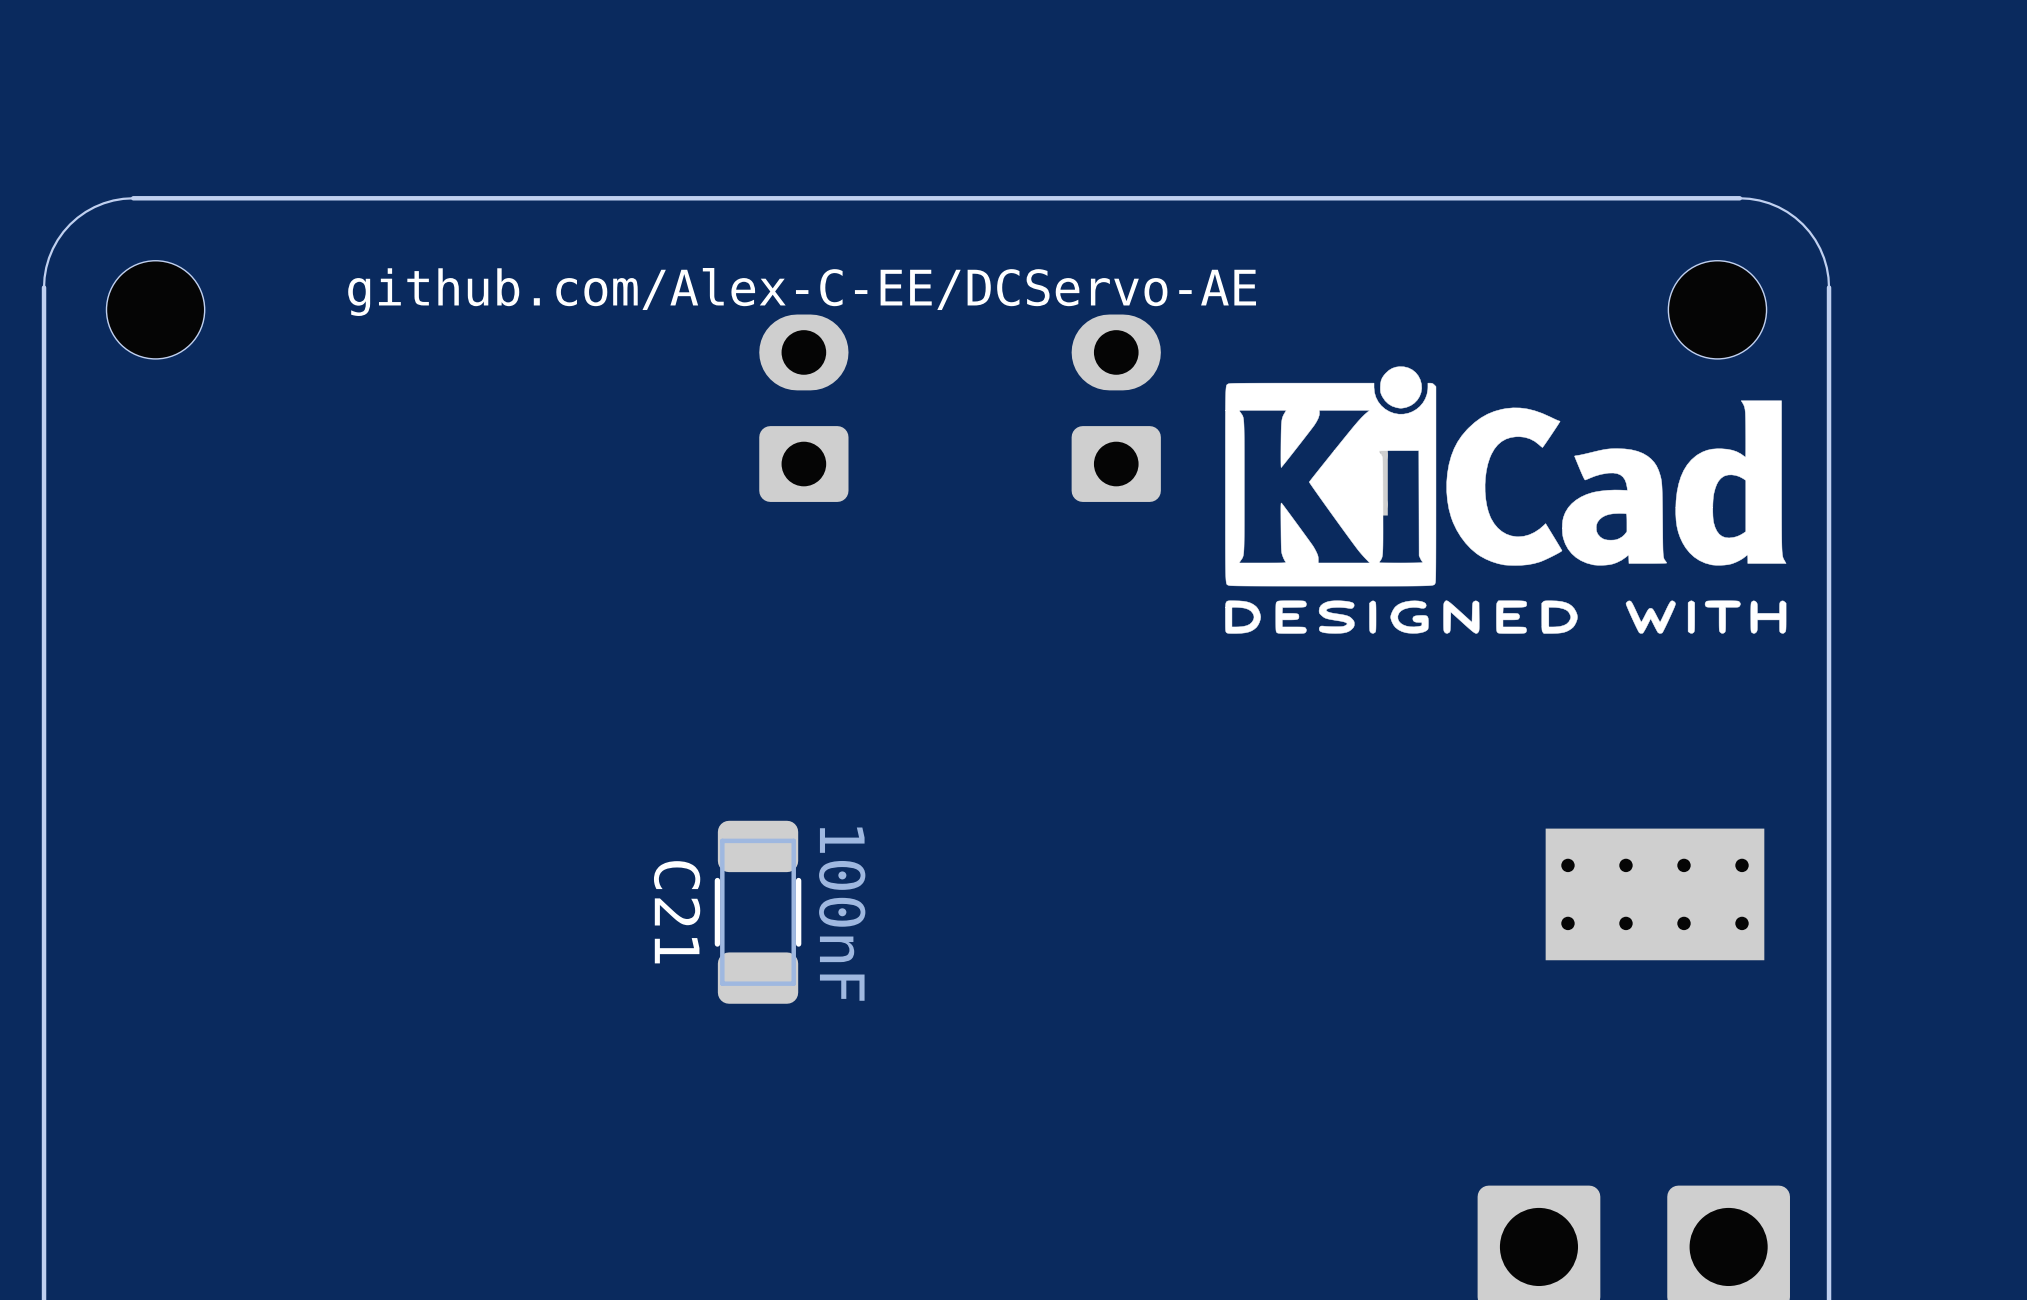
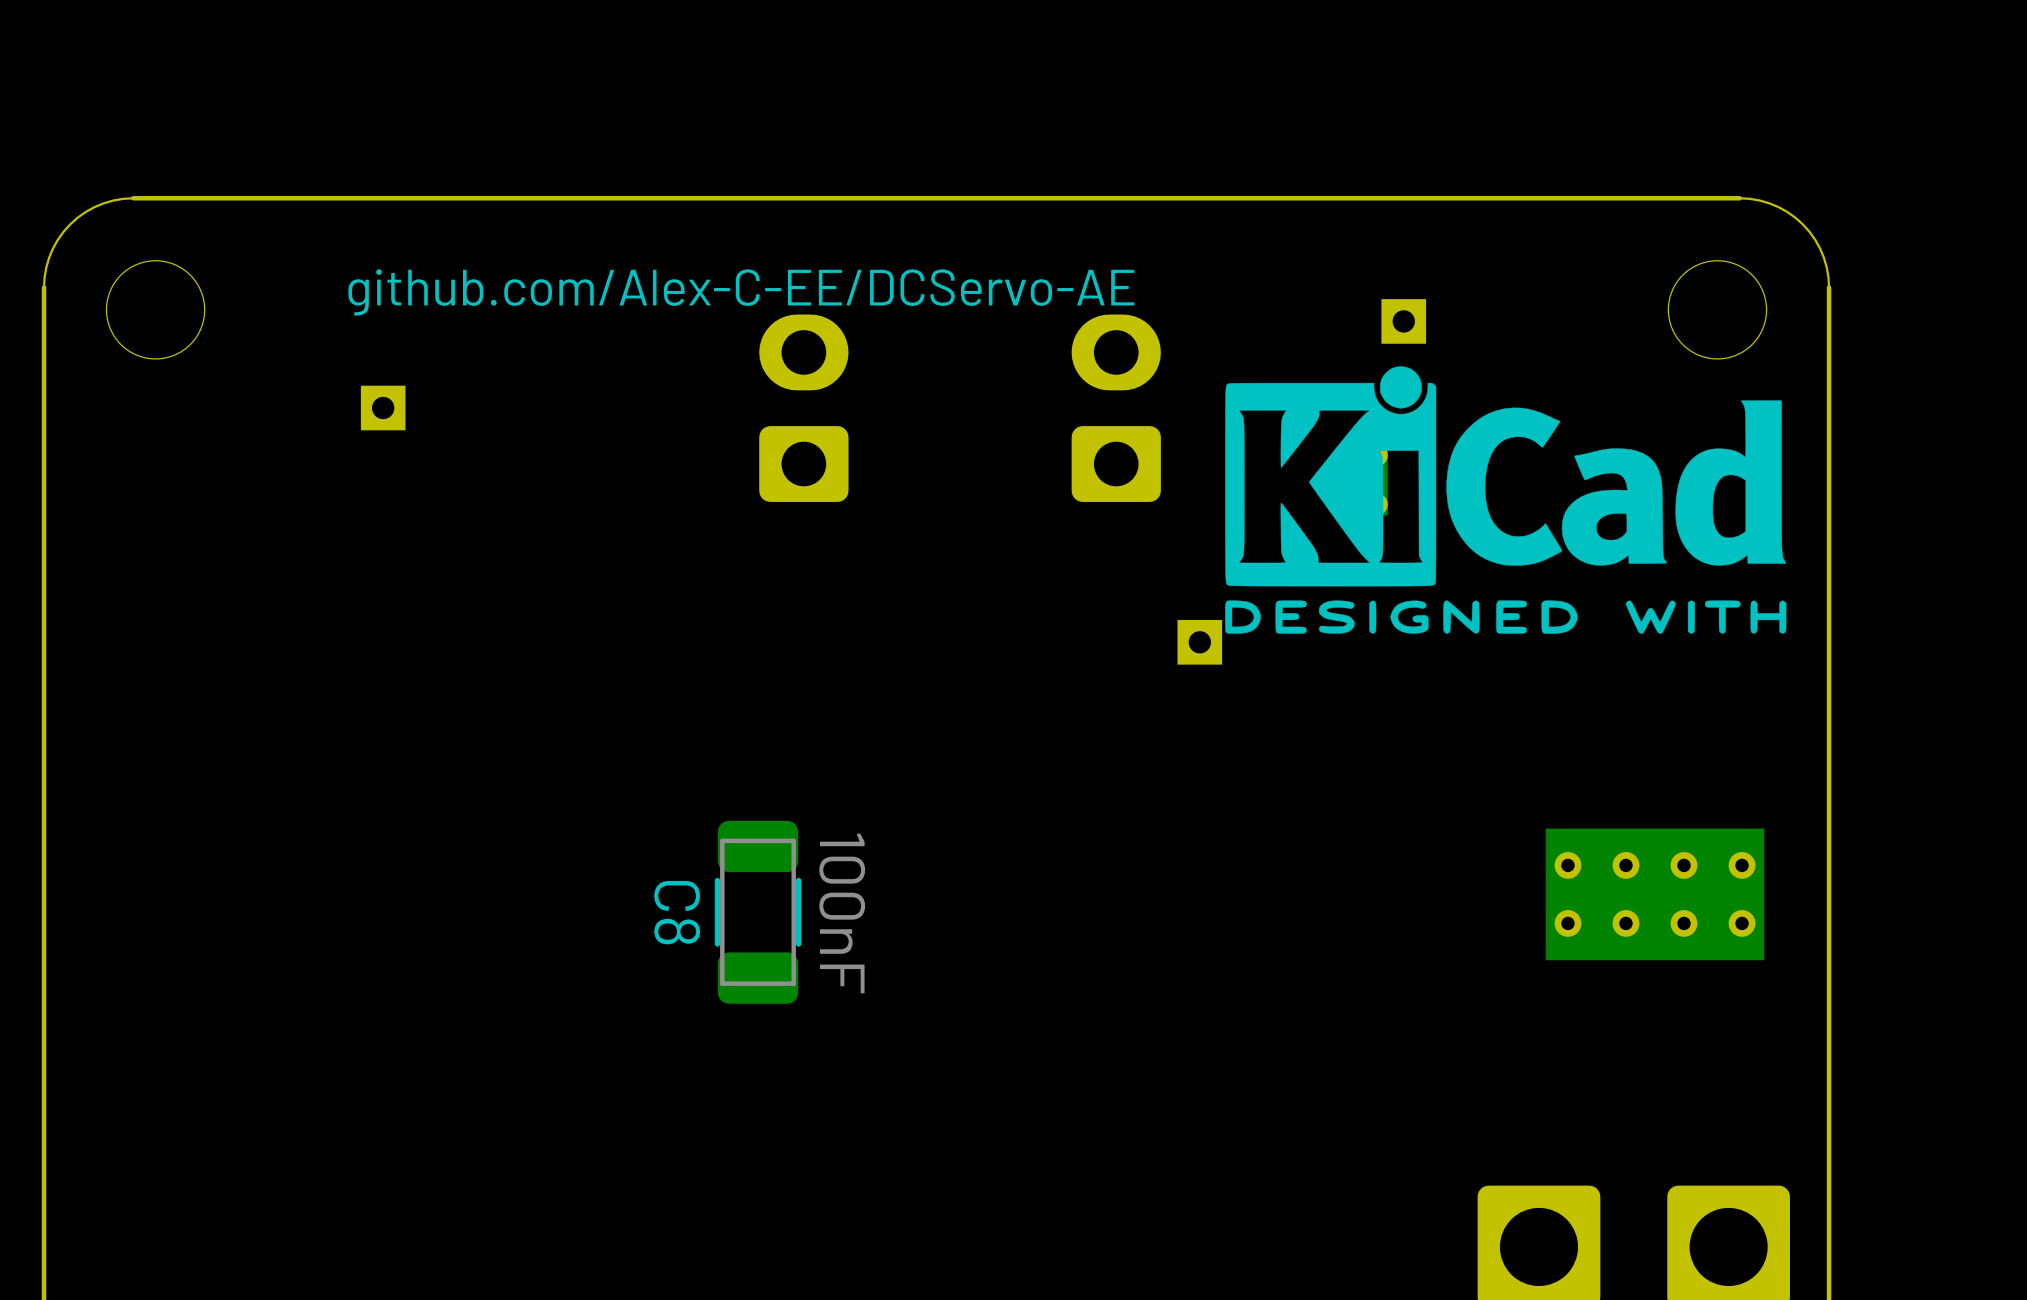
part: none -> (1403, 321)
part: none -> (383, 408)
part: none -> (1199, 642)
C21 name: C21 (677, 912) -> C8 (677, 912)

